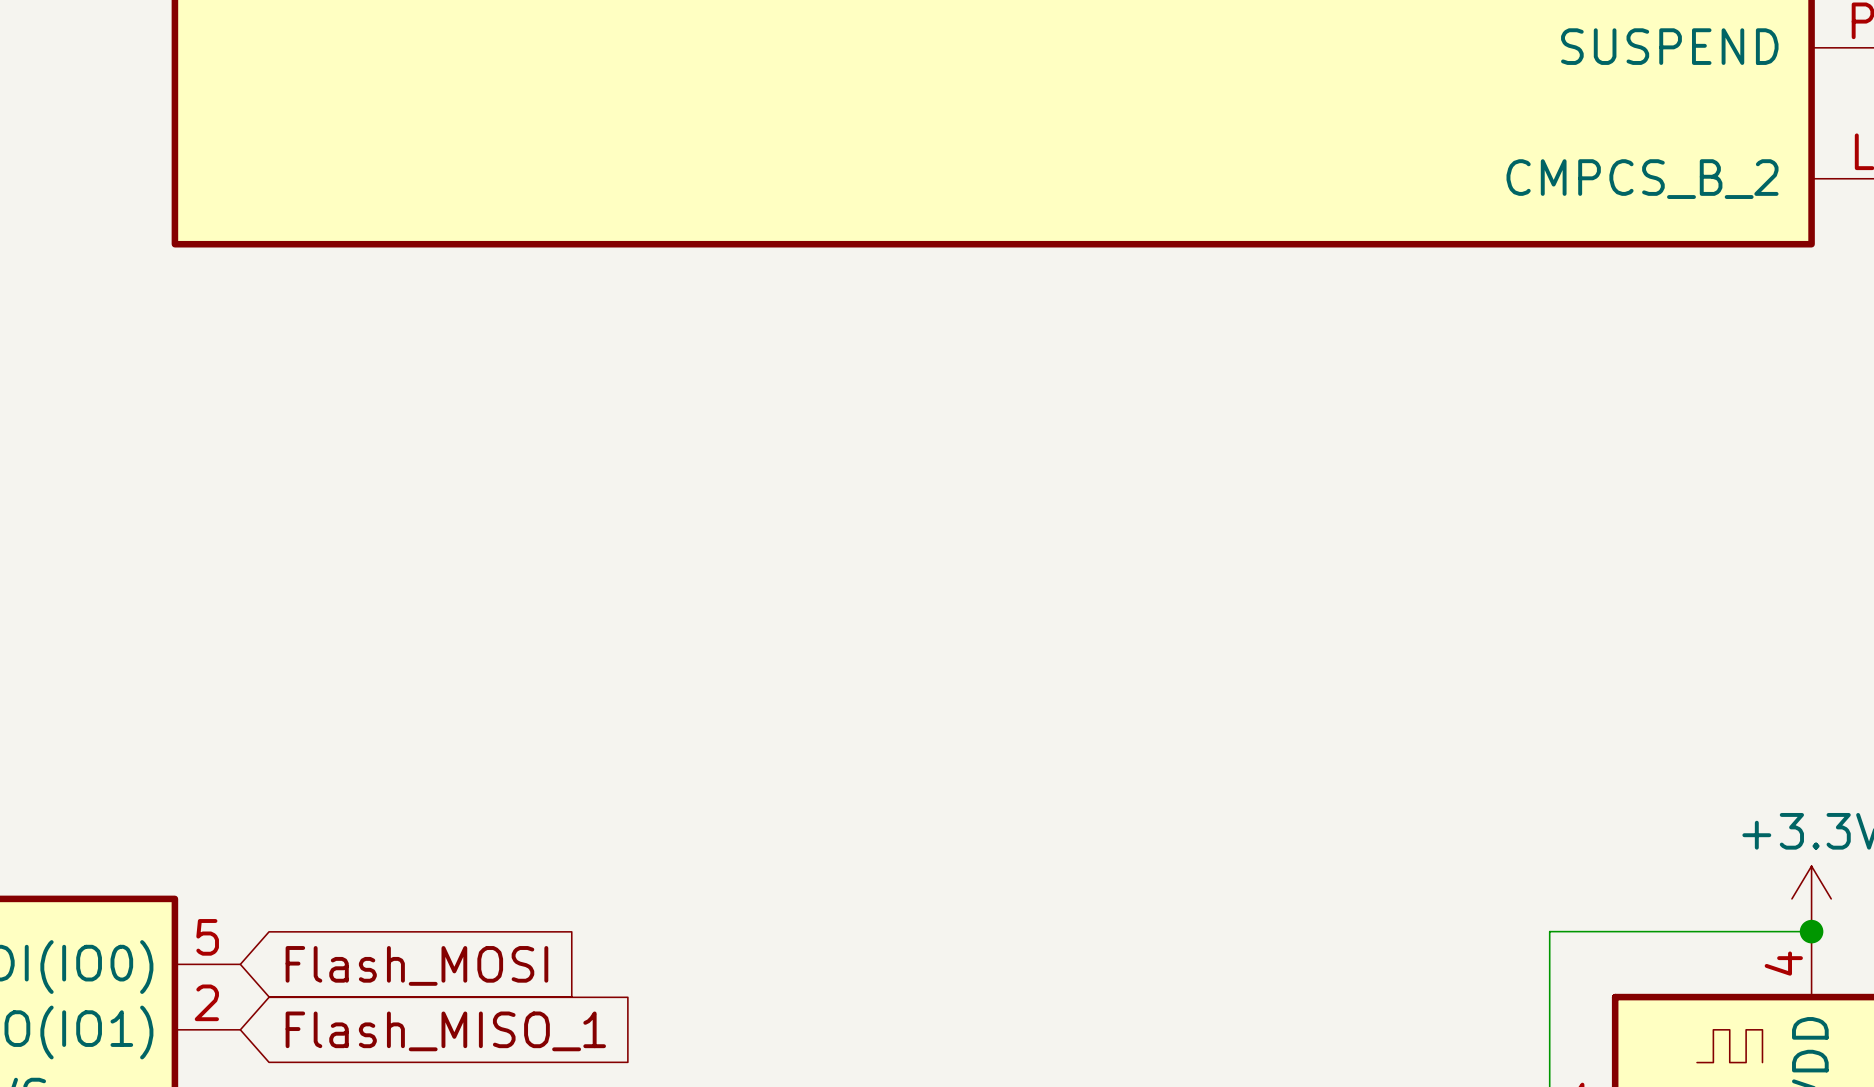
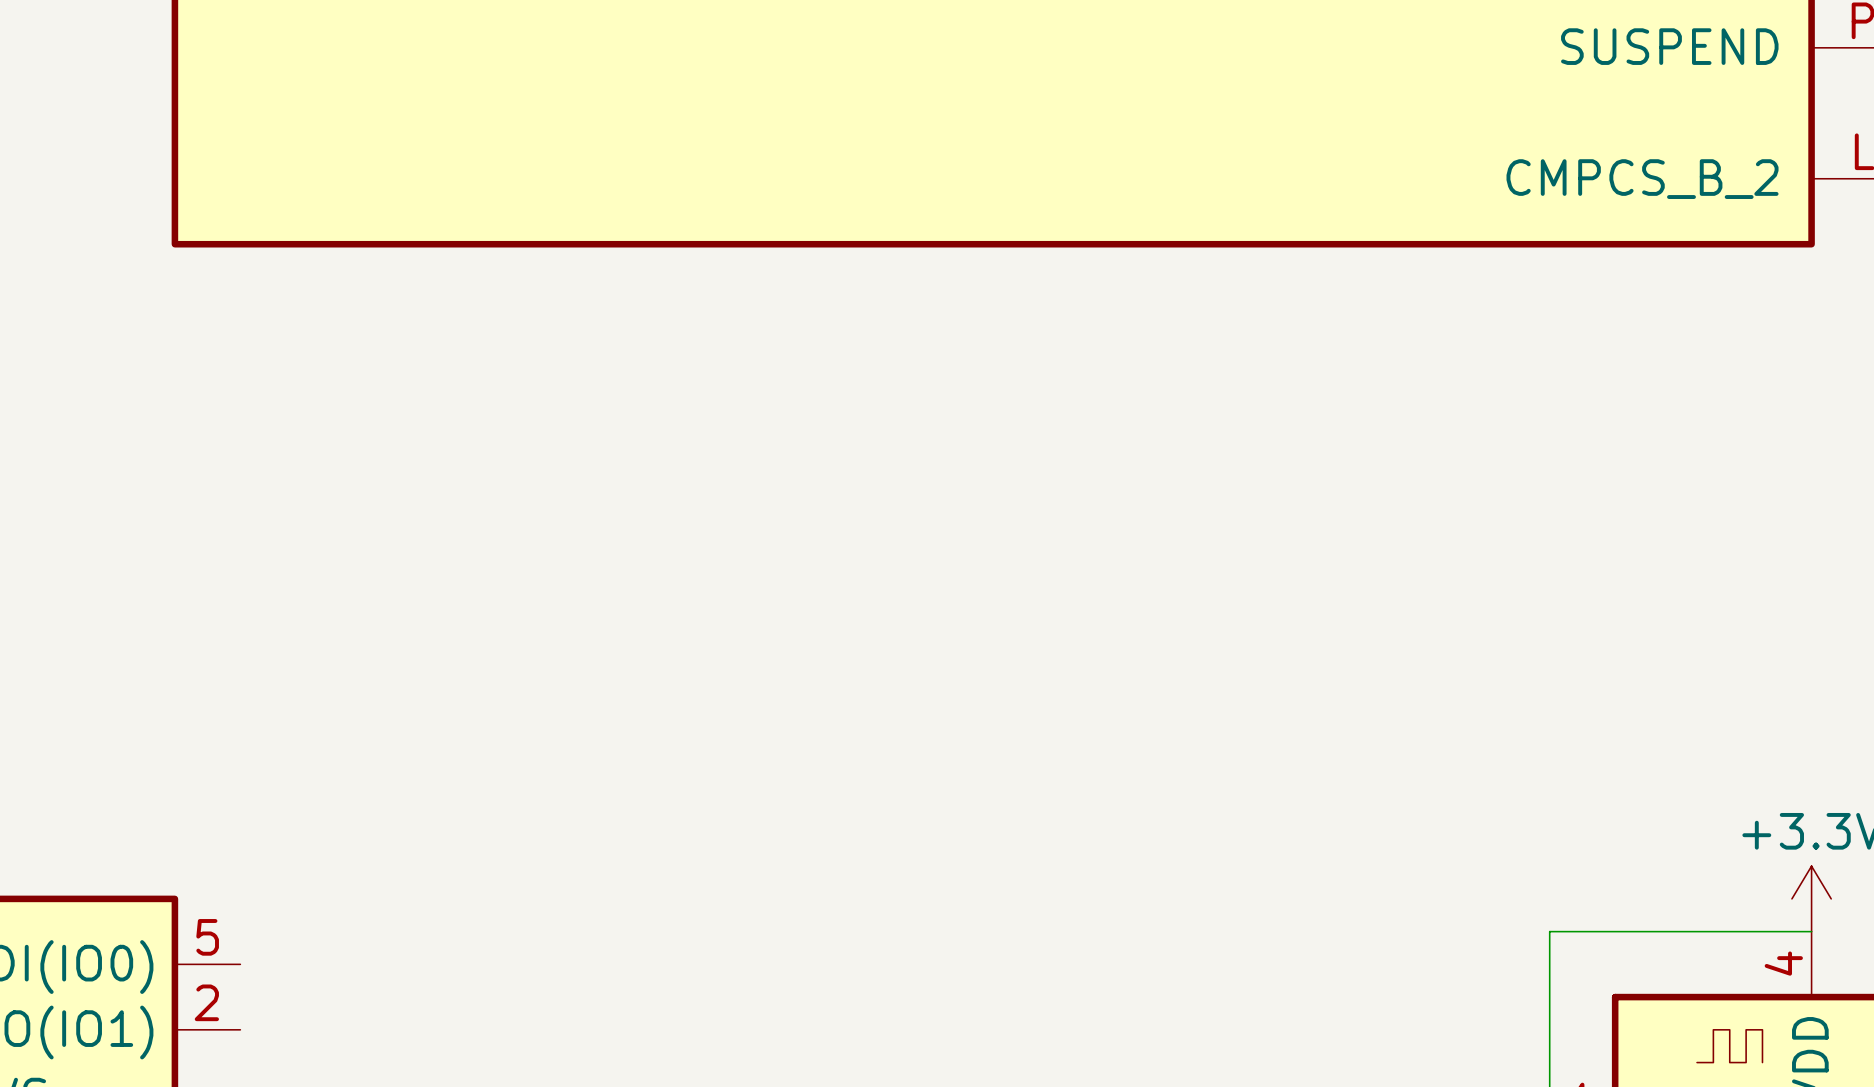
junction: (1811, 931) -> none
global label: Flash_MOSI (416, 965) -> none
global label: Flash_MISO_1 (445, 1031) -> none

